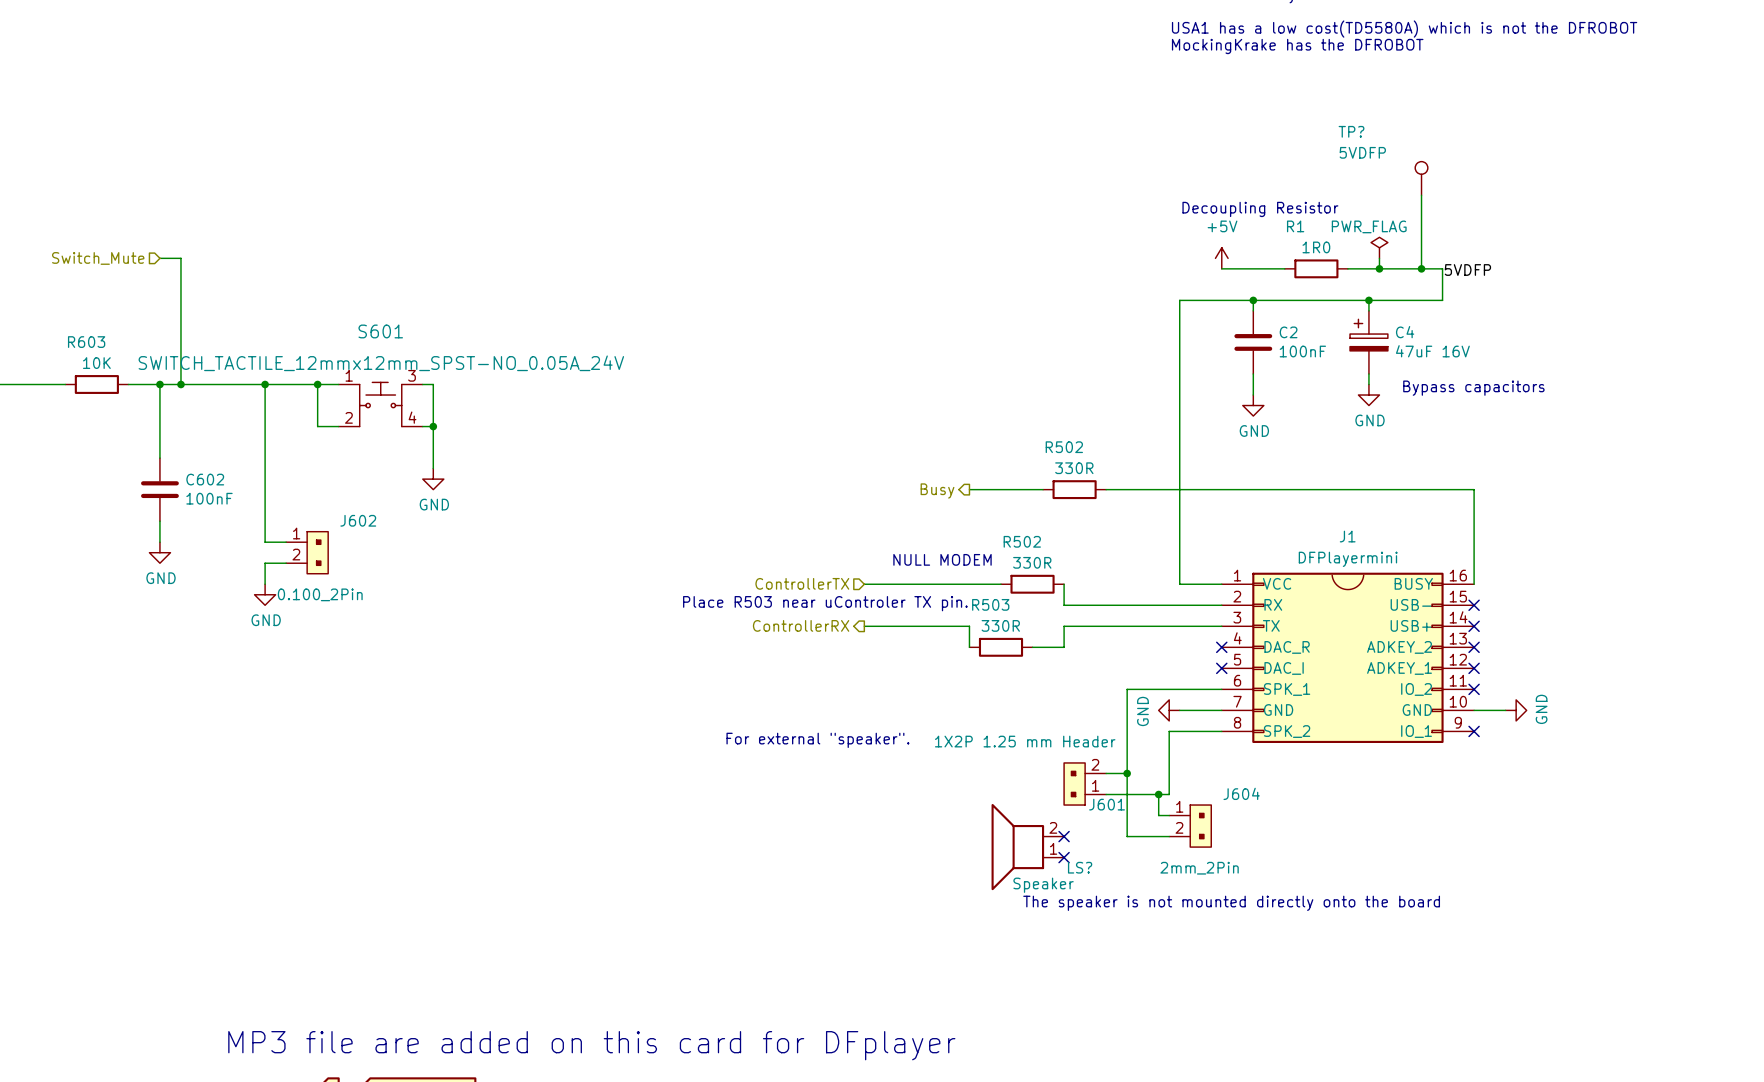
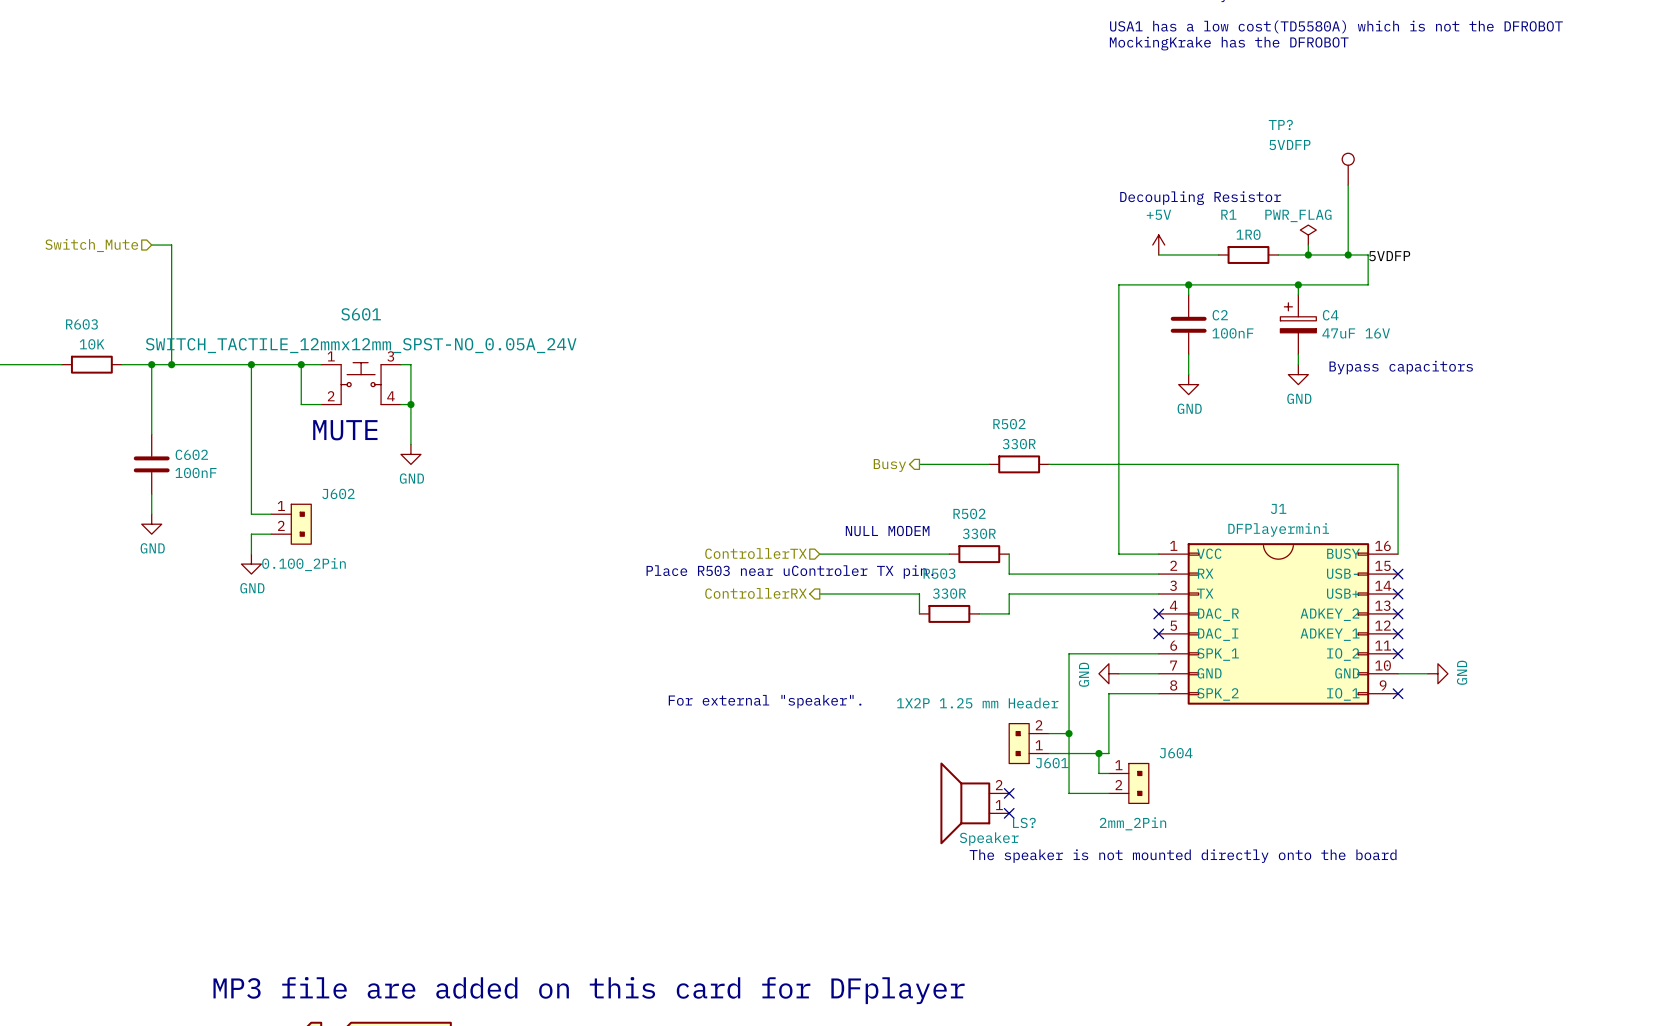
text: none -> MUTE (345, 430)

